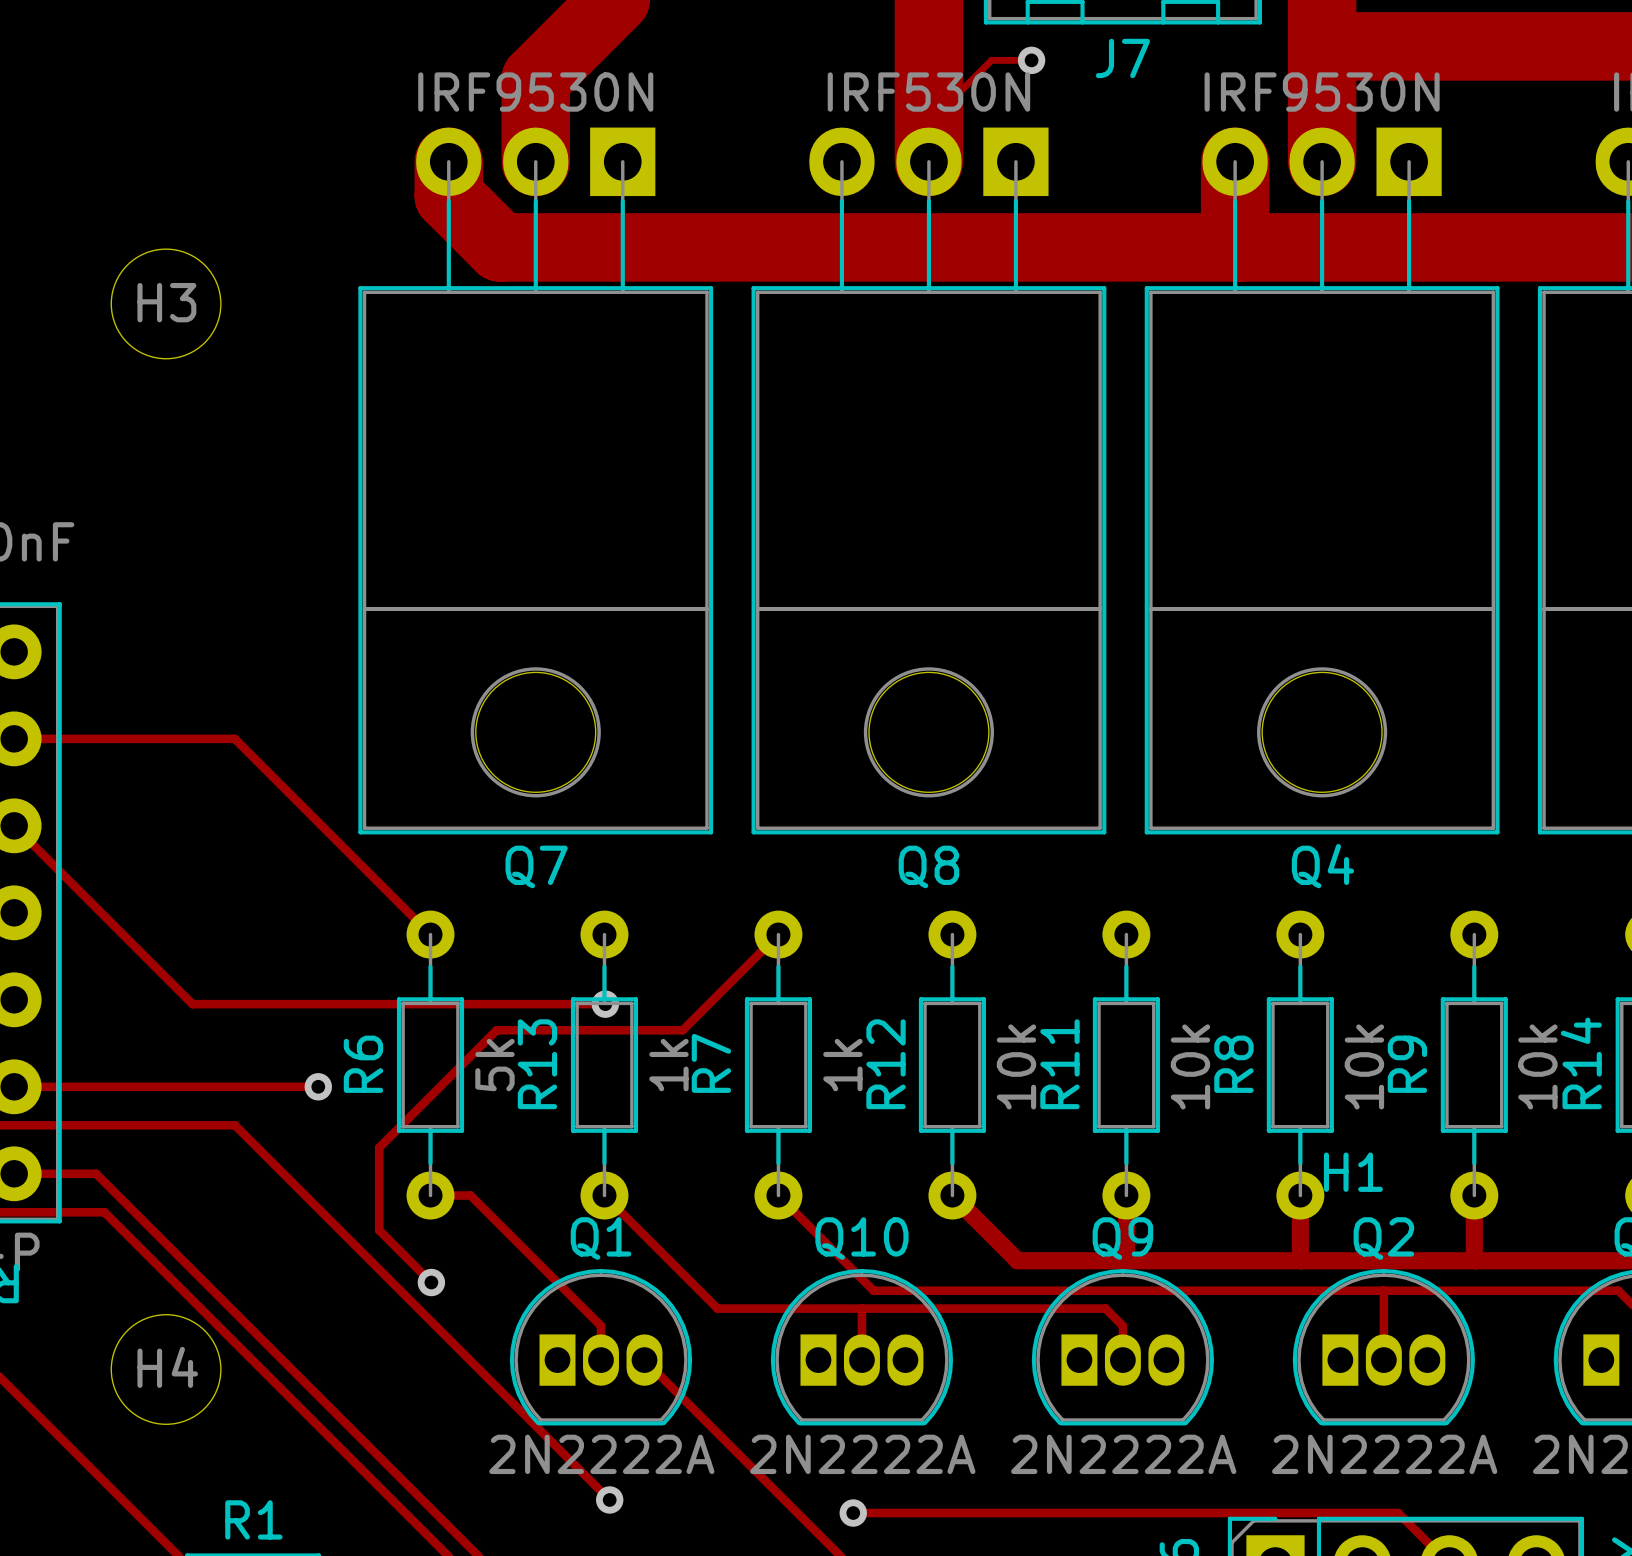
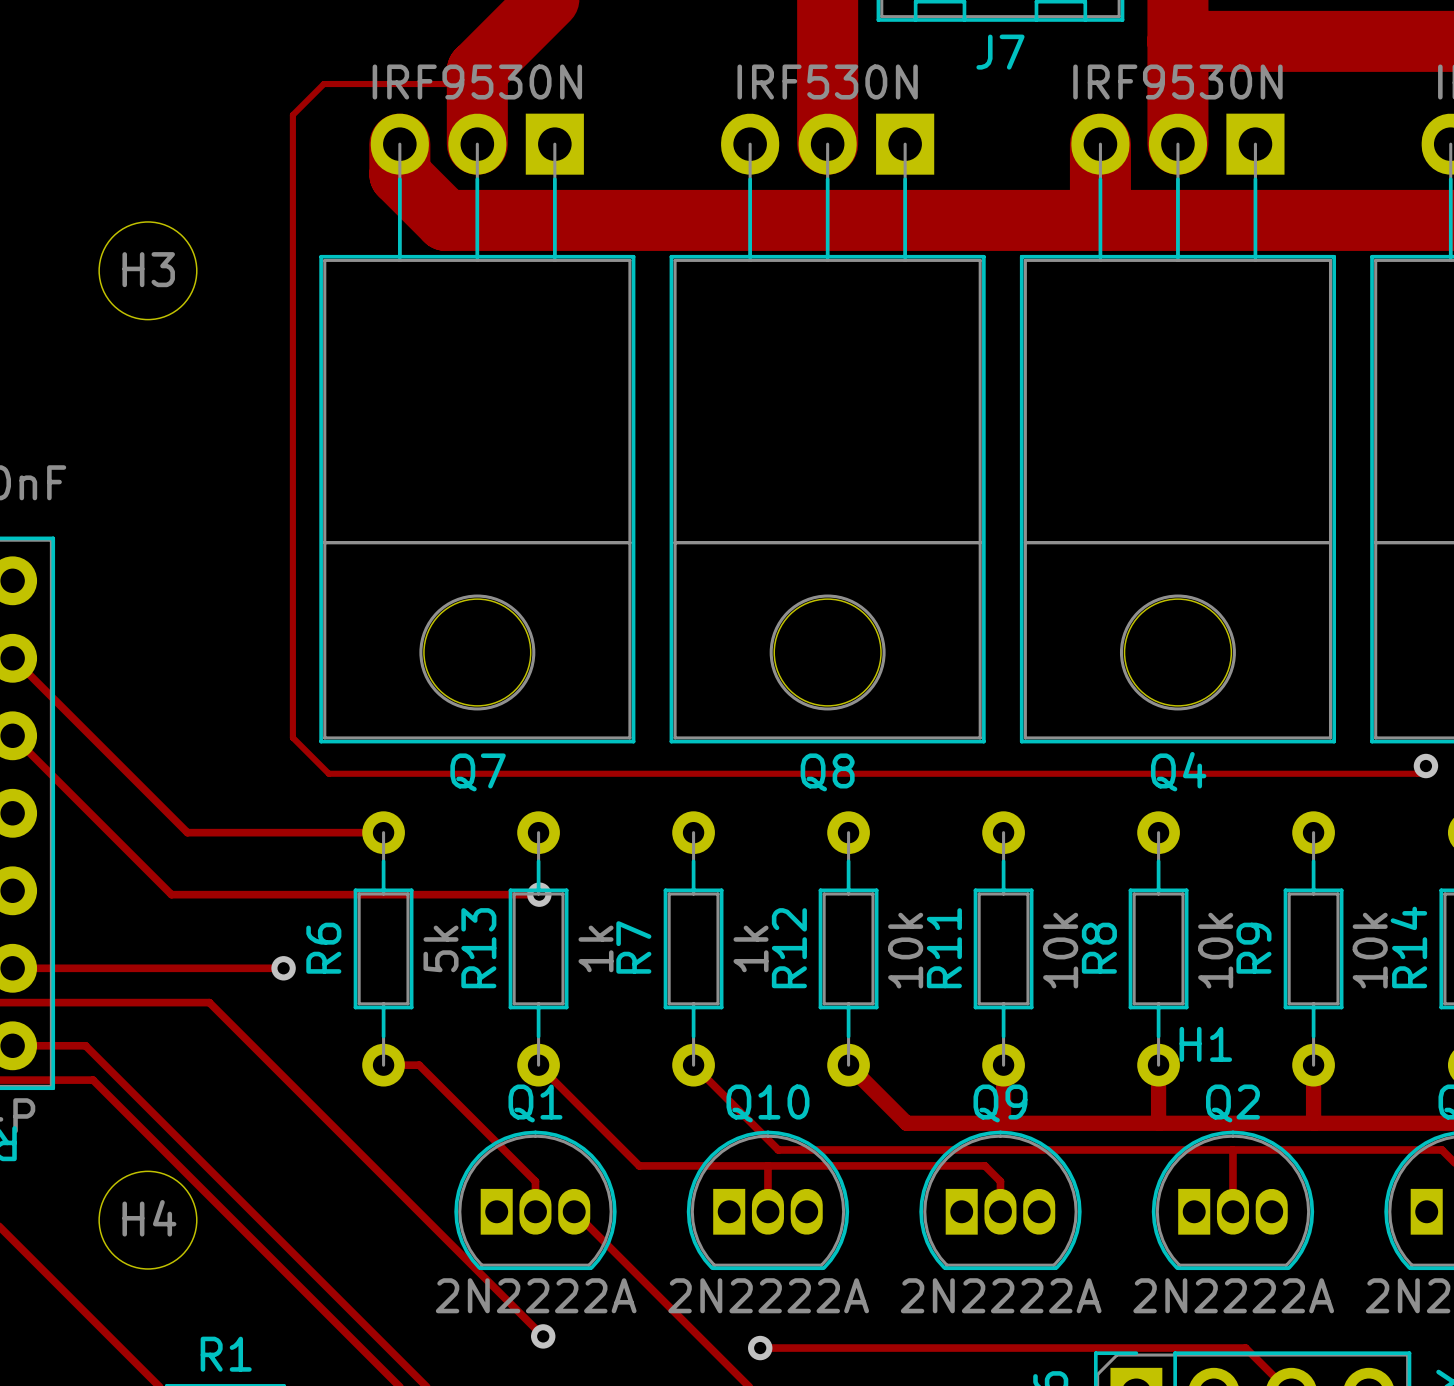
track: (1031, 60) (991, 60) (928, 123) -> none
via: (1031, 60) -> none
track: none -> (477, 144) (477, 84) (323, 84) (292, 115) (292, 737) (328, 773) (1418, 773) (1425, 766)
track: (14, 738) (234, 738) (430, 934) -> (13, 658) (187, 832) (383, 832)
via: none -> (1425, 766)
track: (778, 934) (682, 1030) (496, 1030) (379, 1147) (379, 1230) (431, 1282) -> none
via: (431, 1282) -> none

